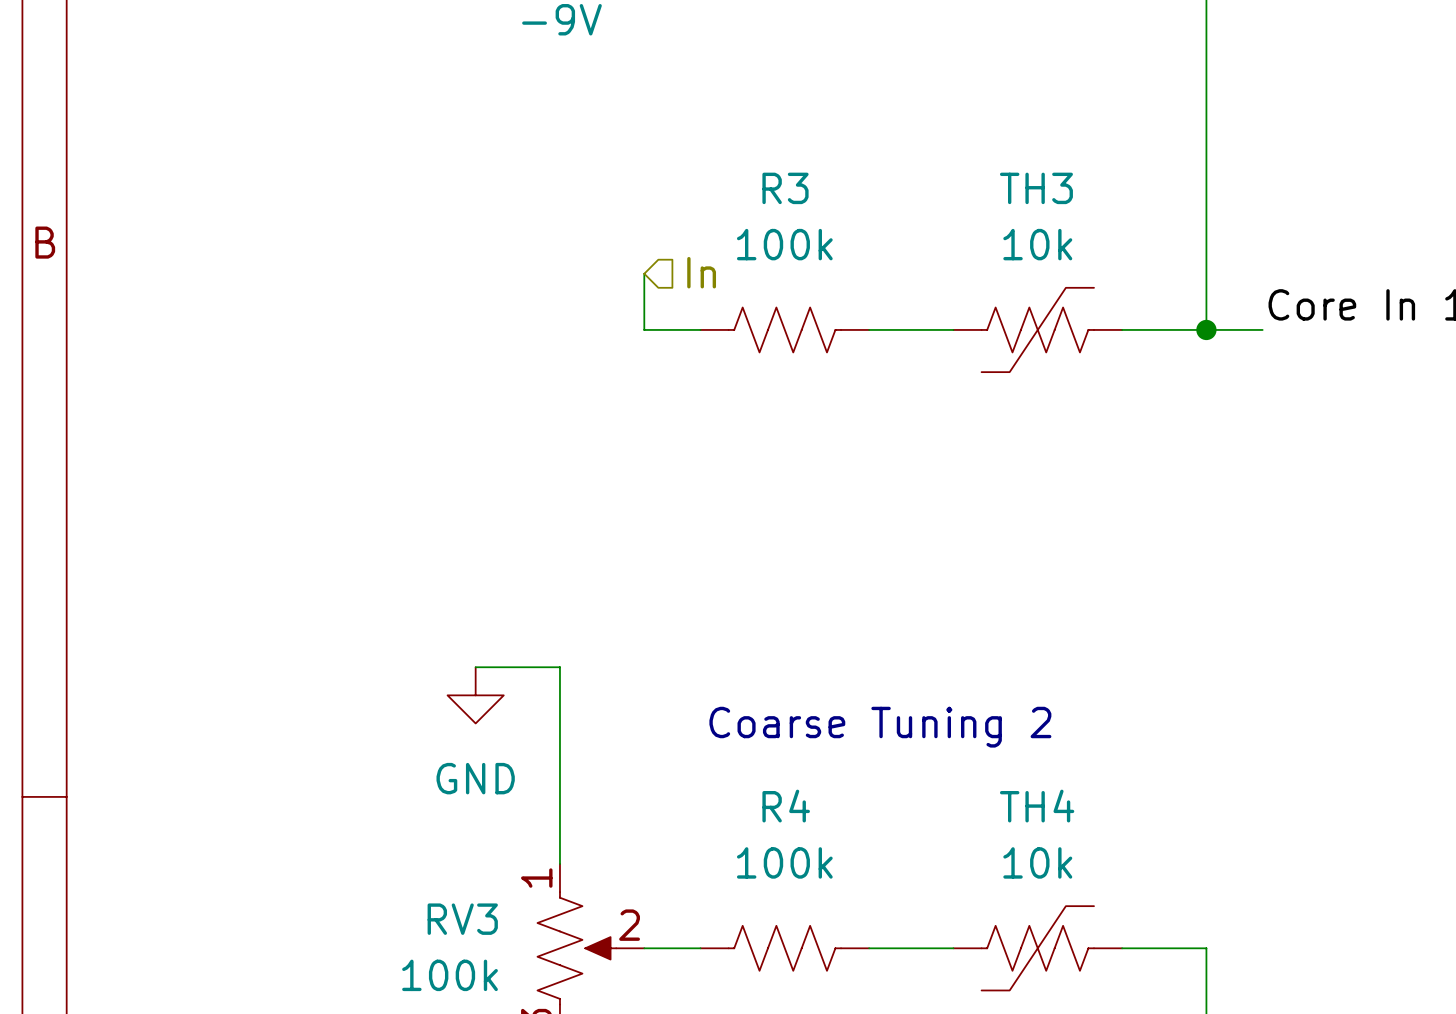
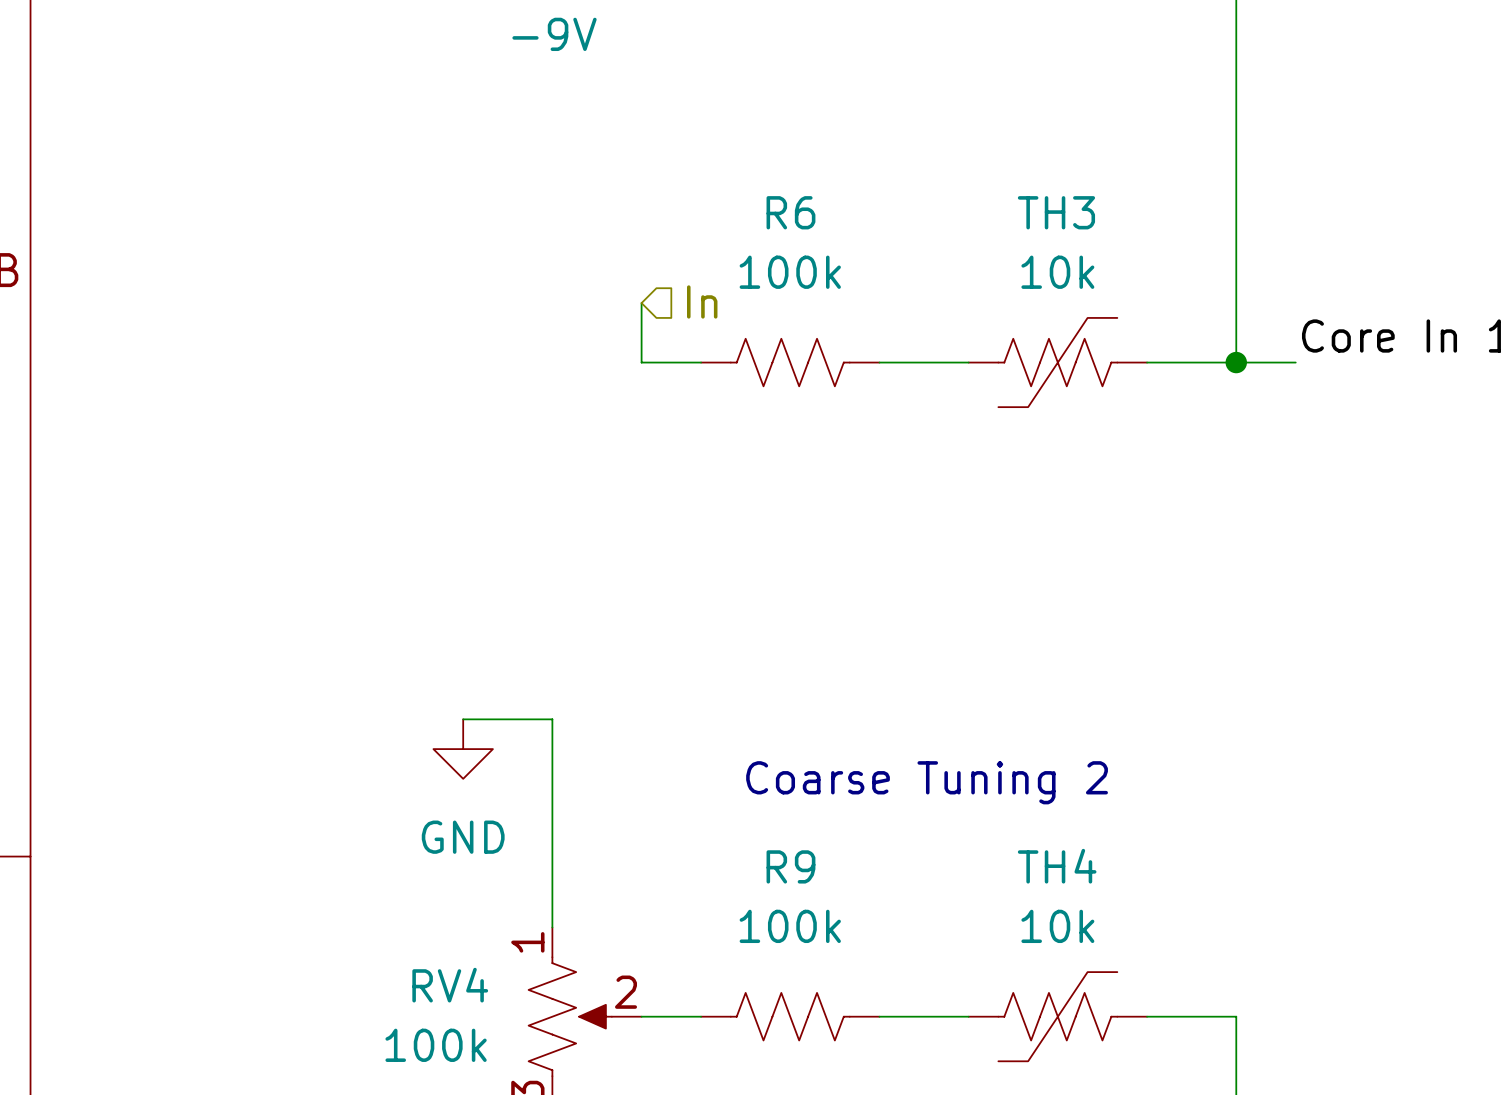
R3 name: R3 (785, 188) -> R6 (790, 212)
text position: Coarse Tuning 2 (880, 727) -> Coarse Tuning 2 (927, 782)
R4 name: R4 (786, 806) -> R9 (790, 866)
RV3 name: RV3 (462, 919) -> RV4 (450, 985)

